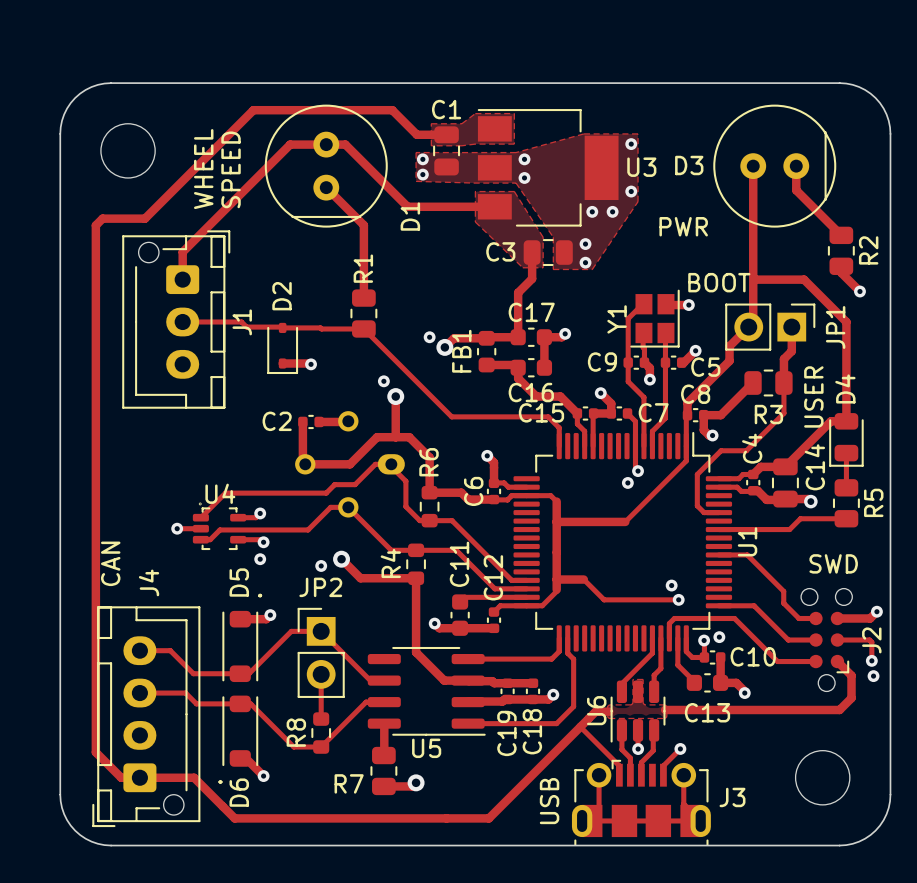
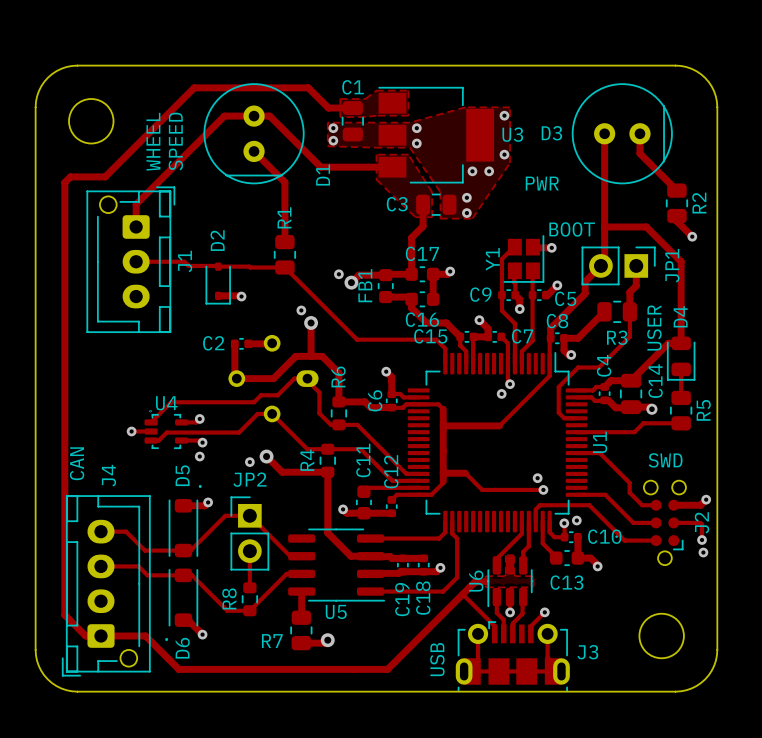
track: (837, 661) (851, 675) (851, 698) (839, 709) (665, 709) -> none

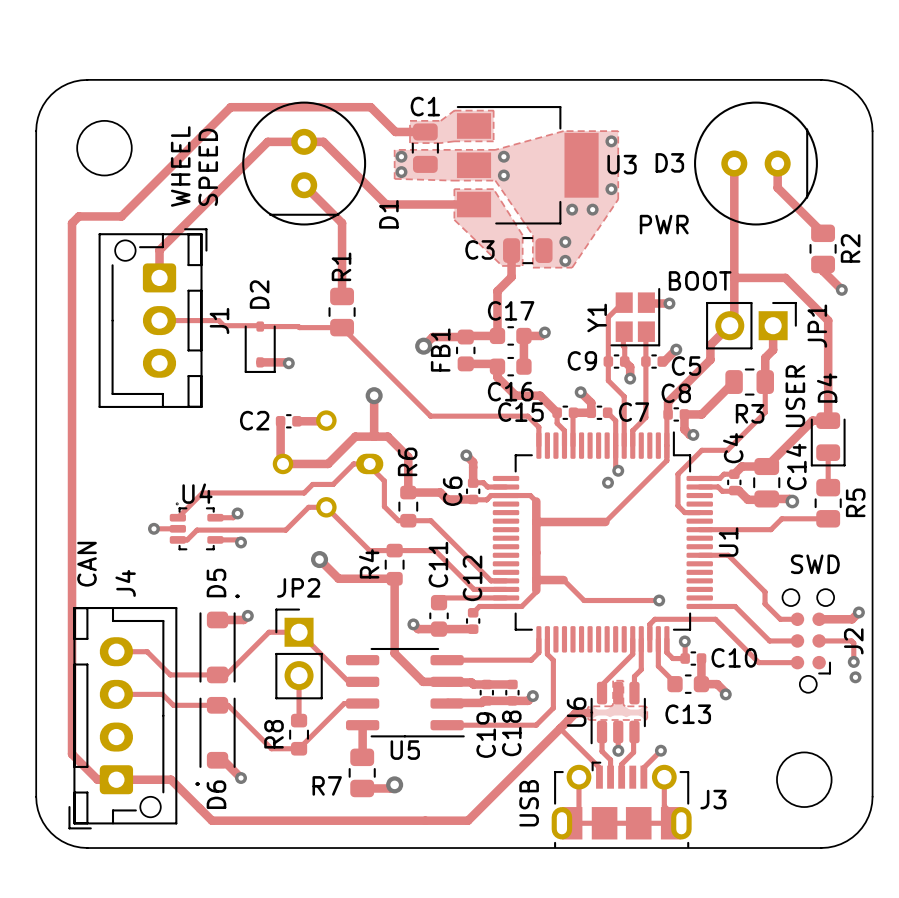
via: (338, 274) -> none
via: (301, 310) -> none
via: (199, 456) -> none
via: (249, 462) -> none
via: (537, 478) -> none
via: (576, 520) -> none

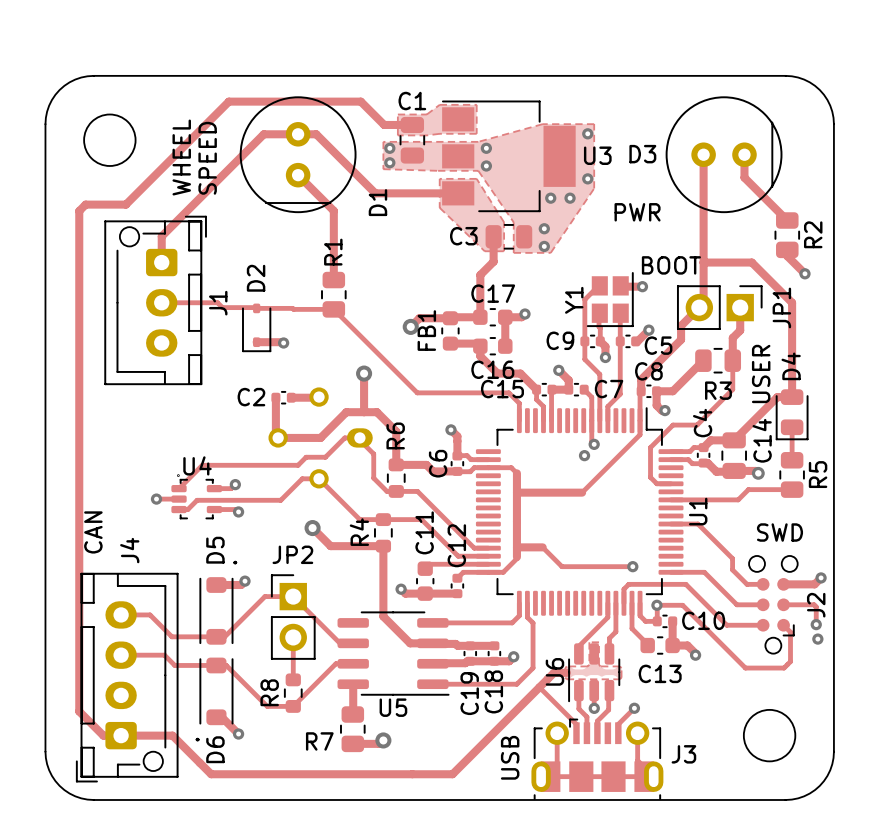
track: none -> (656, 605) (682, 605) (745, 668) (784, 668) (790, 661) (790, 632) (783, 625)

